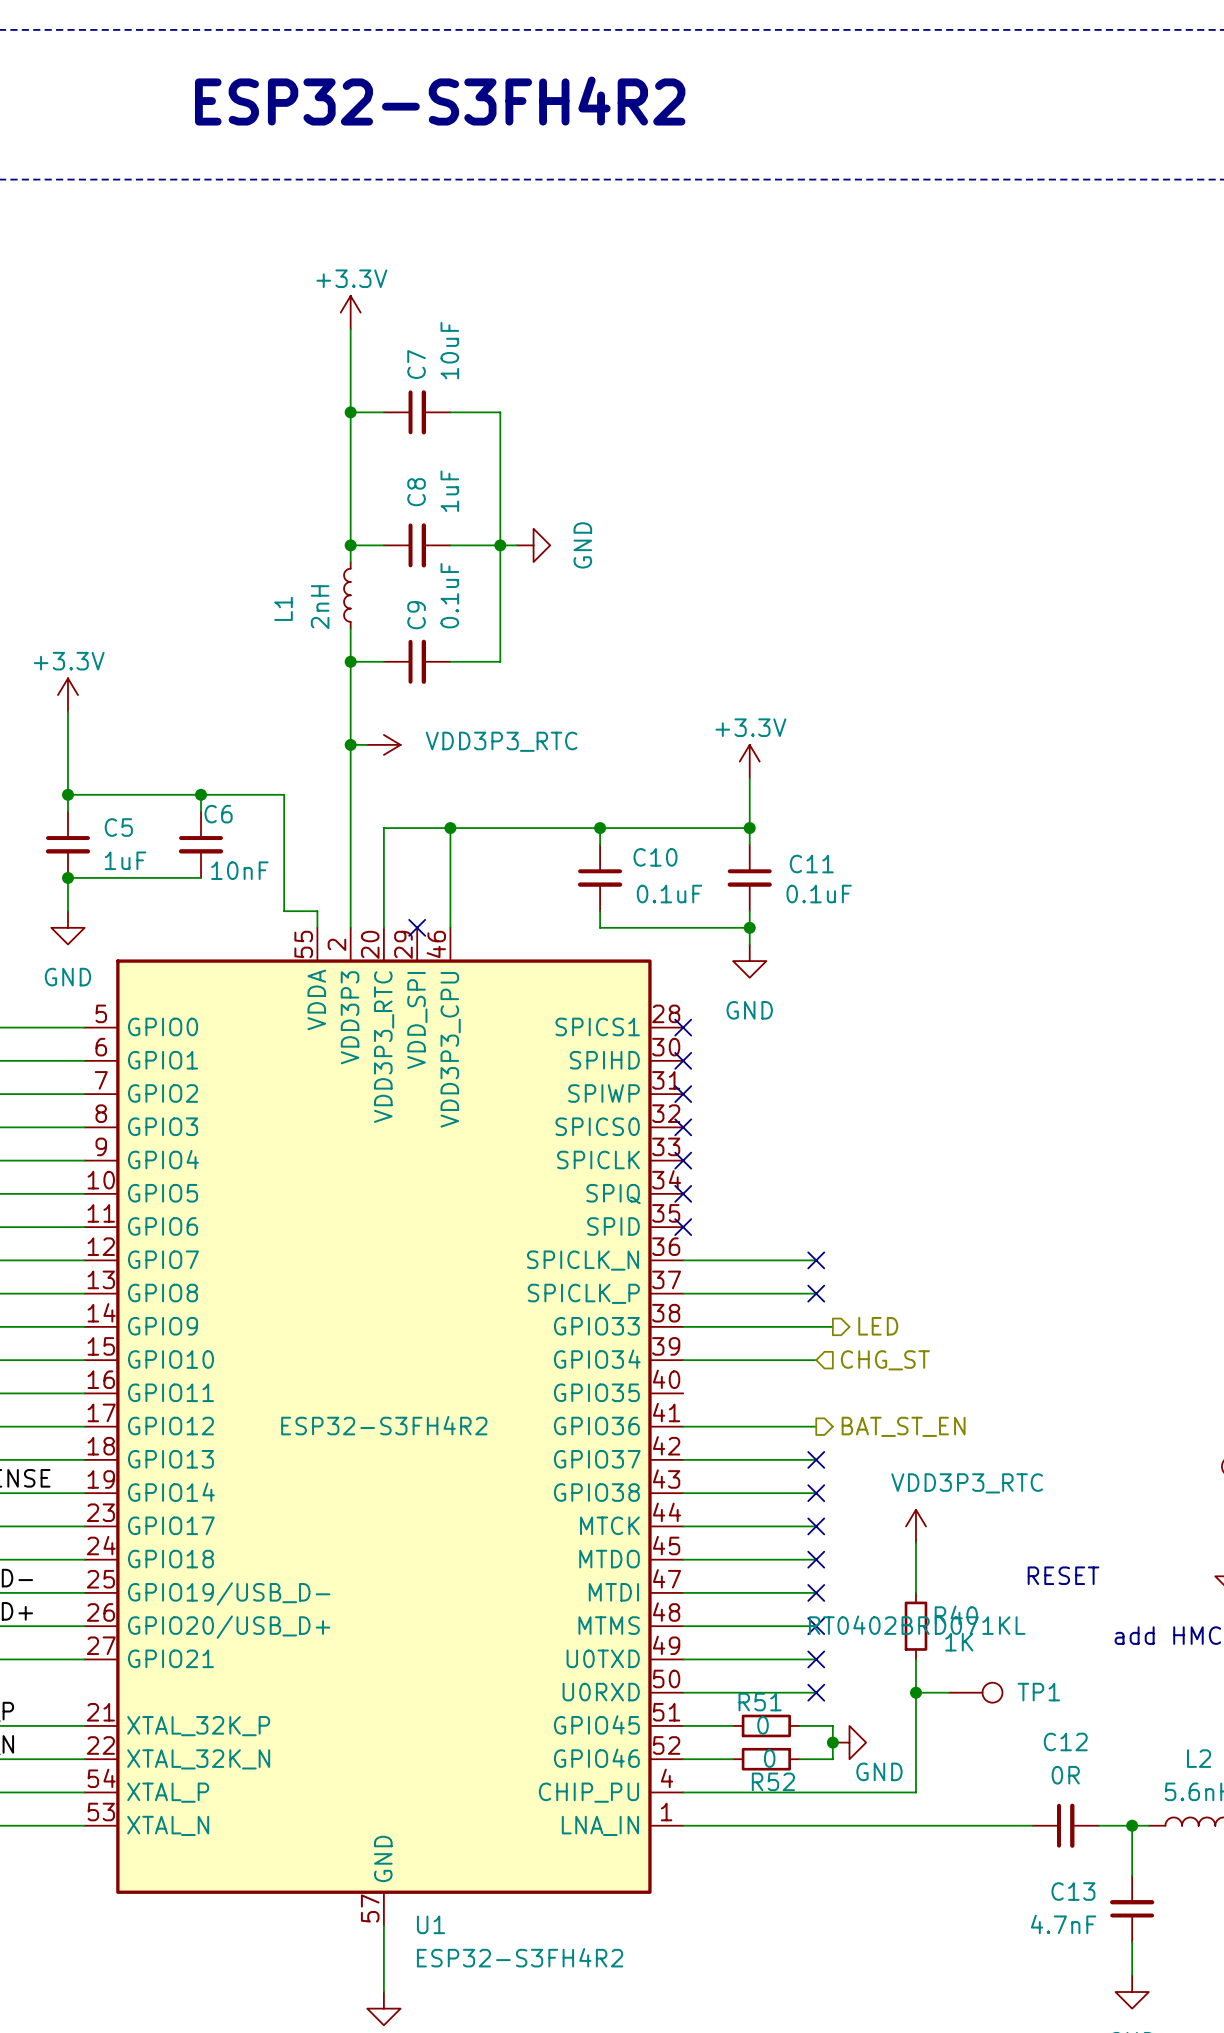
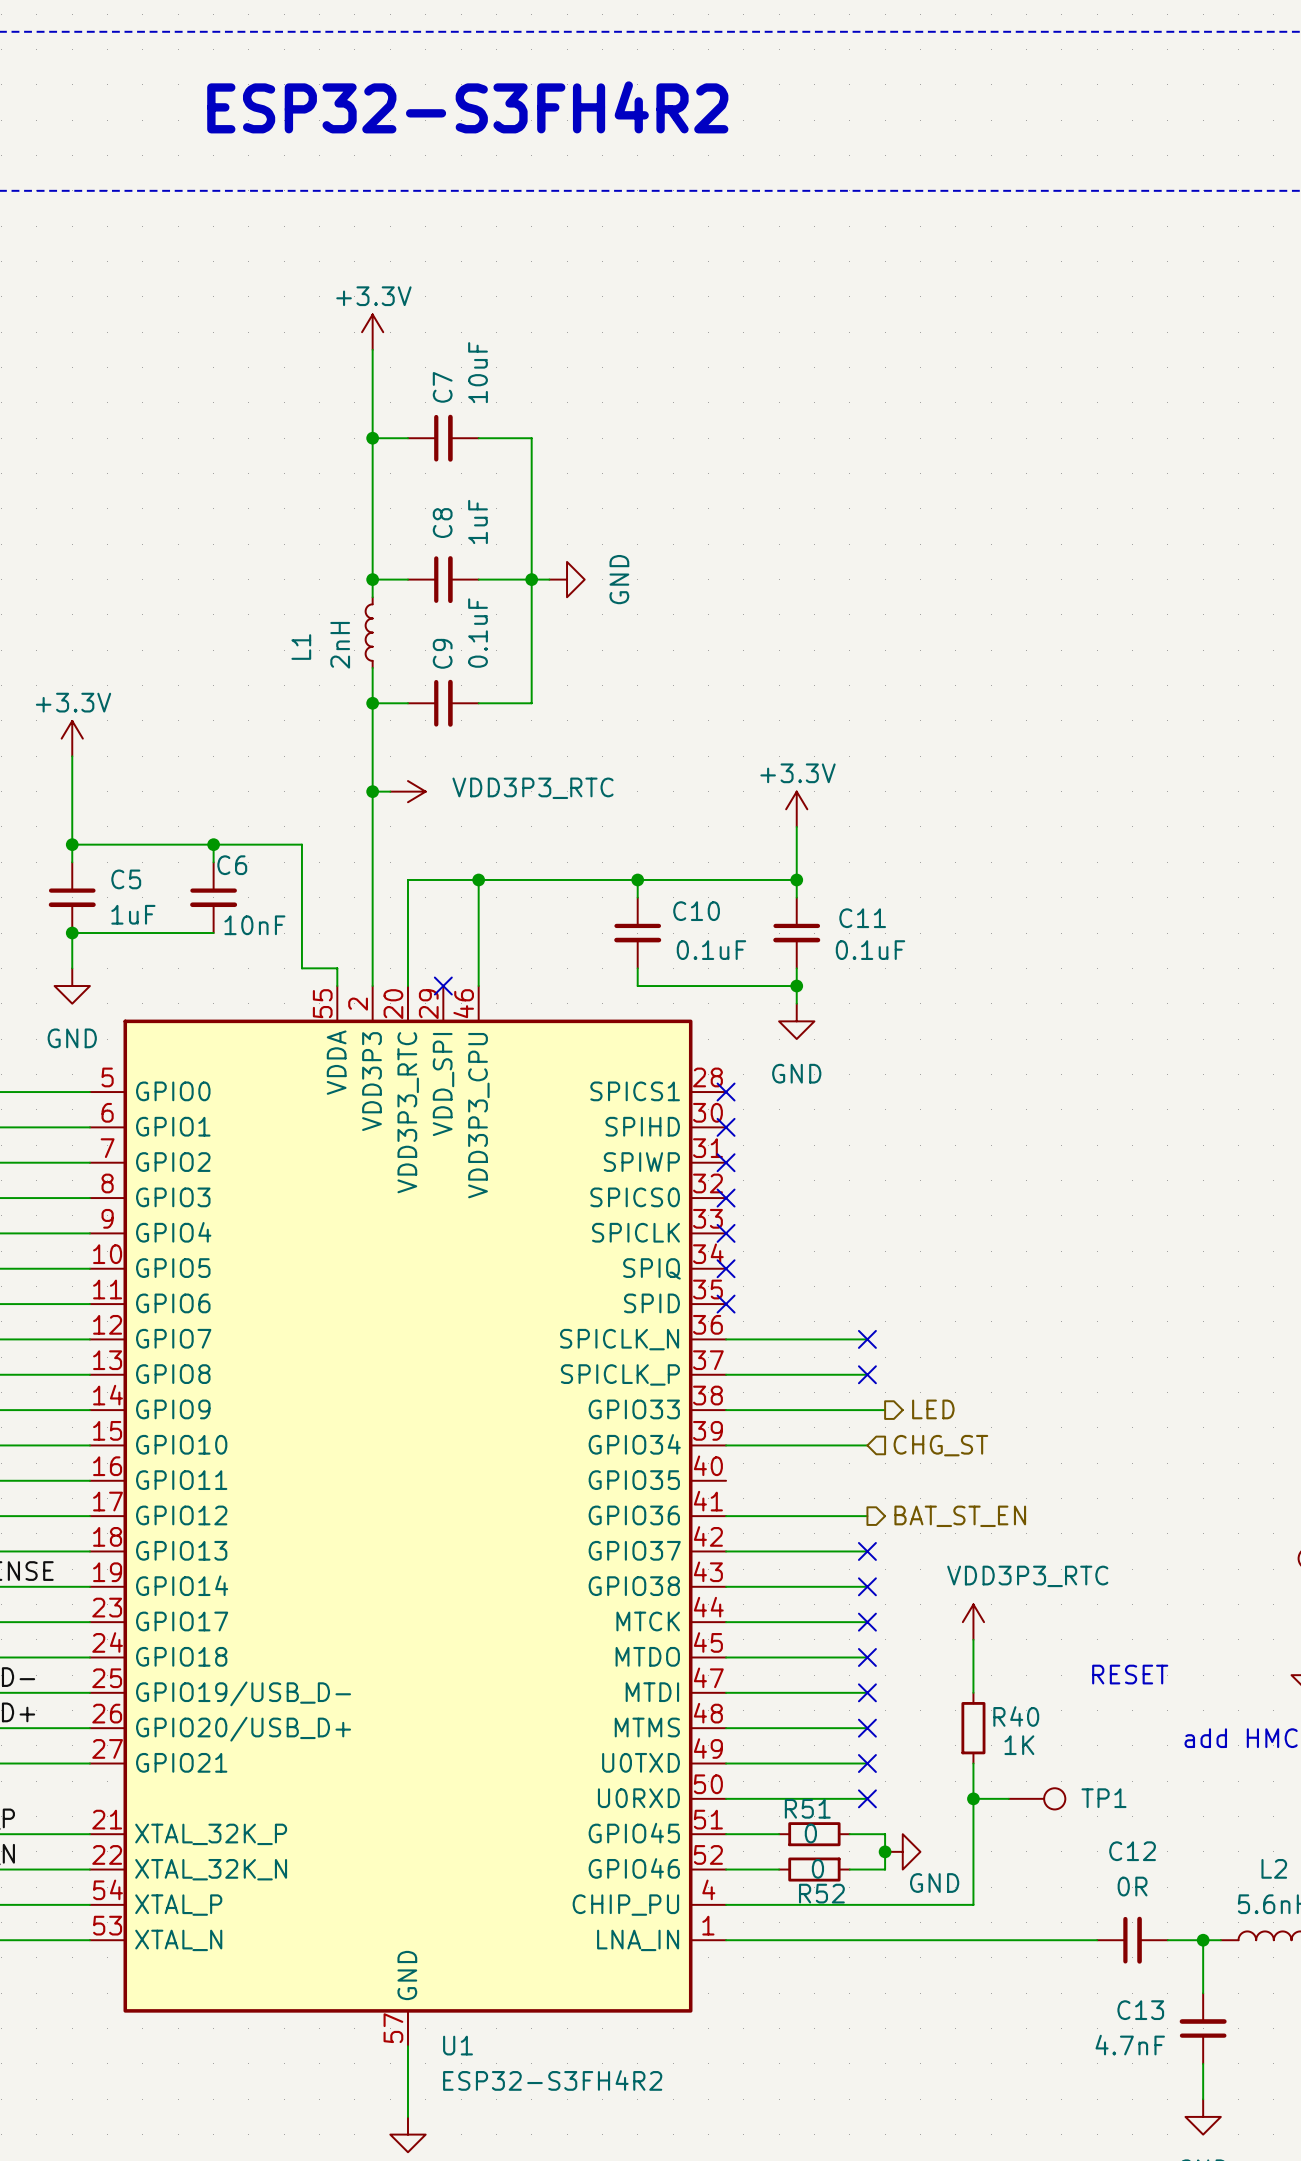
U1 text: ESP32-S3FH4R2 (384, 1425) -> none
R40 text: RT0402BRD071KL (917, 1625) -> none

